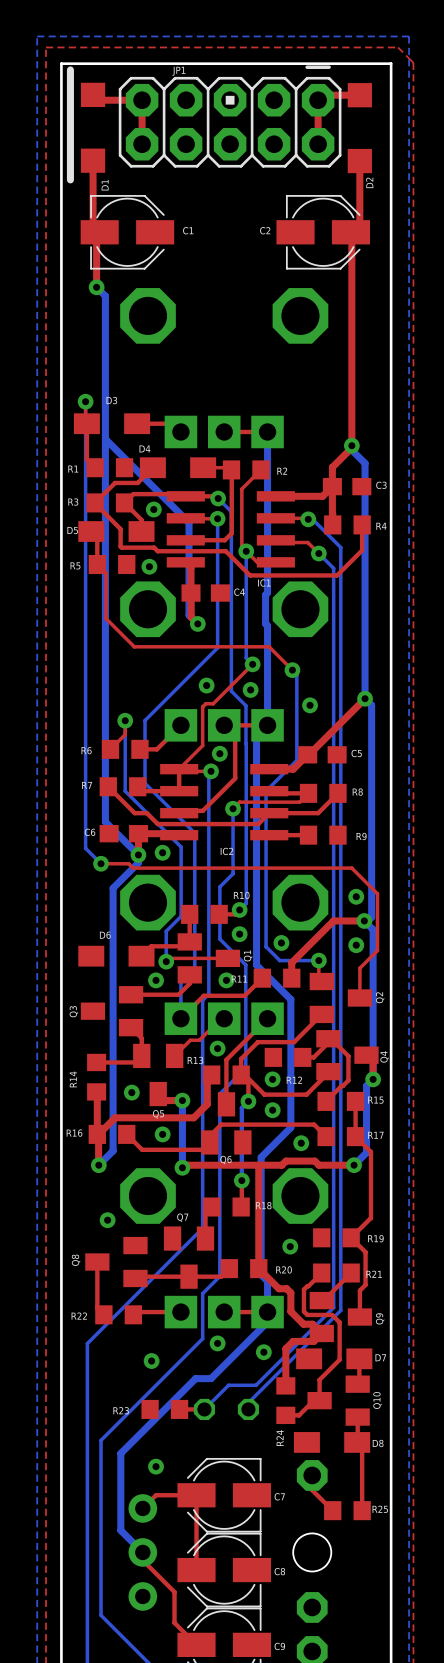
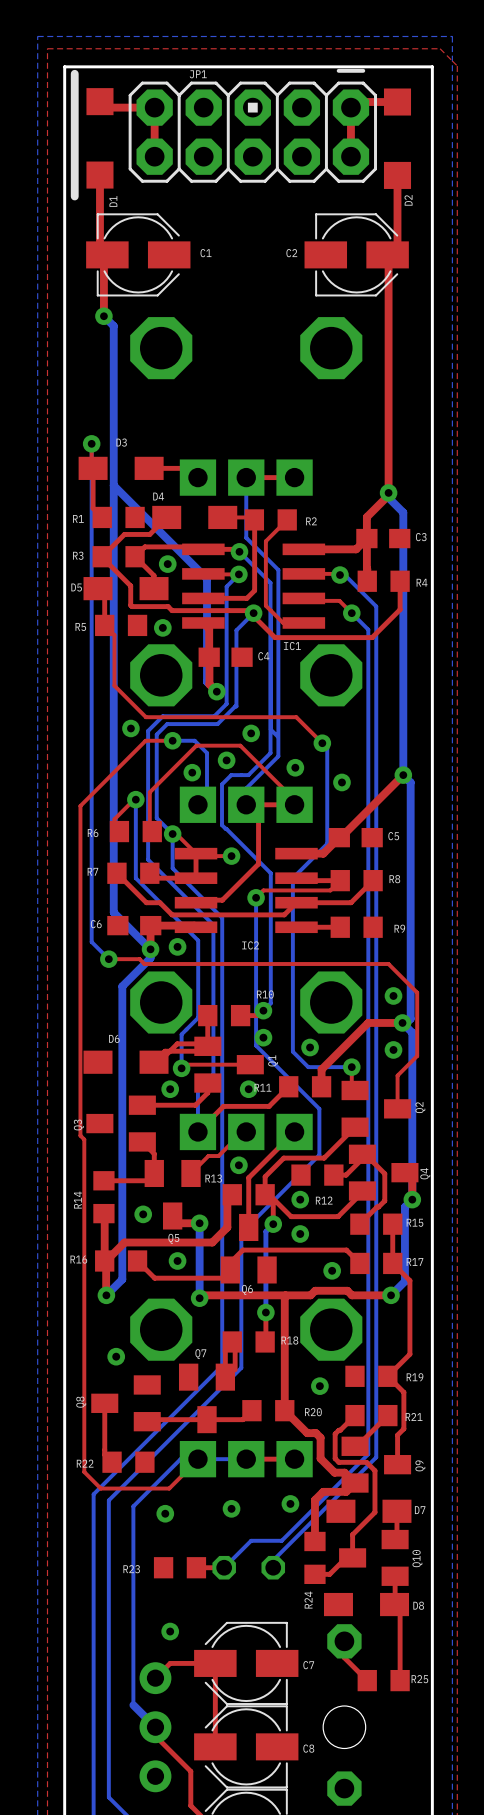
bottom track: none -> (246, 477) (246, 537) (278, 569) (278, 756) (246, 788) (246, 804)
bottom track: (267, 431) (267, 592) (265, 594) (265, 623) (267, 625) (267, 725) (256, 736) (256, 965) (290, 999) (290, 1127) (261, 1157) (261, 1274) (267, 1281) (267, 1322) (211, 1378) (195, 1378) (120, 1453) (120, 1530) (123, 1532) -> (246, 1459) (180, 1459) (133, 1506) (133, 1705)
bottom track: (231, 511) (231, 691) (245, 705) (246, 786) -> (254, 566) (270, 582) (270, 753) (248, 775) (231, 775) (222, 784) (222, 825) (270, 873)
bottom track: (217, 518) (217, 647) (145, 720) (145, 783) -> (238, 574) (226, 586) (226, 703) (214, 716) (162, 716) (148, 730) (148, 859) (157, 869)
via position: (246, 551) -> (253, 613)
via: none -> (130, 728)
top track: (252, 664) (213, 703) (205, 703) (202, 706) (202, 745) (179, 769) -> (172, 834) (176, 834) (196, 853)
via position: (252, 664) -> (251, 733)
bottom track: none -> (172, 740) (194, 740) (207, 753) (207, 795) (197, 804)
via: none -> (172, 740)
via position: (250, 689) -> (295, 767)
via: none -> (192, 772)
top track: none -> (133, 799) (114, 819) (114, 831)
top track: (125, 720) (125, 734) (110, 749) -> none
top track: (180, 725) (156, 749) (139, 749) -> none
top track: none -> (294, 804) (294, 799) (240, 745) (196, 745) (149, 792) (149, 829) (147, 831)
via: none -> (172, 834)
via: (219, 753) -> none
bottom track: (211, 771) (208, 773) (208, 994) (202, 1000) -> (253, 613) (236, 630) (236, 706) (217, 724) (167, 724) (156, 734) (156, 818) (172, 834) (172, 868) (222, 917) (222, 1111)
bottom track: (233, 873) (219, 886) (219, 939) (245, 965) (245, 1067) (219, 1093) (219, 1109) -> (256, 970) (256, 1045) (319, 1108) (319, 1155) (241, 1233)
top track: none -> (210, 1043) (177, 1043) (158, 1062)
top track: none -> (232, 1337) (235, 1339) (235, 1369)
bottom track: (219, 1230) (219, 1276) (202, 1293) (202, 1338) (101, 1440) -> (241, 1367) (108, 1500) (108, 1602)
top track: (180, 1312) (136, 1312) (133, 1314) -> (197, 1459) (169, 1488) (100, 1488) (84, 1472) (84, 1139) (80, 1135) (80, 805) (145, 740) (172, 740)
via position: (217, 1343) -> (231, 1508)

